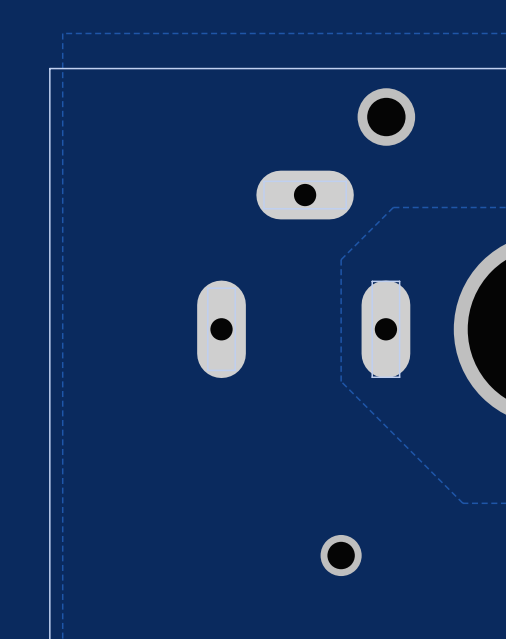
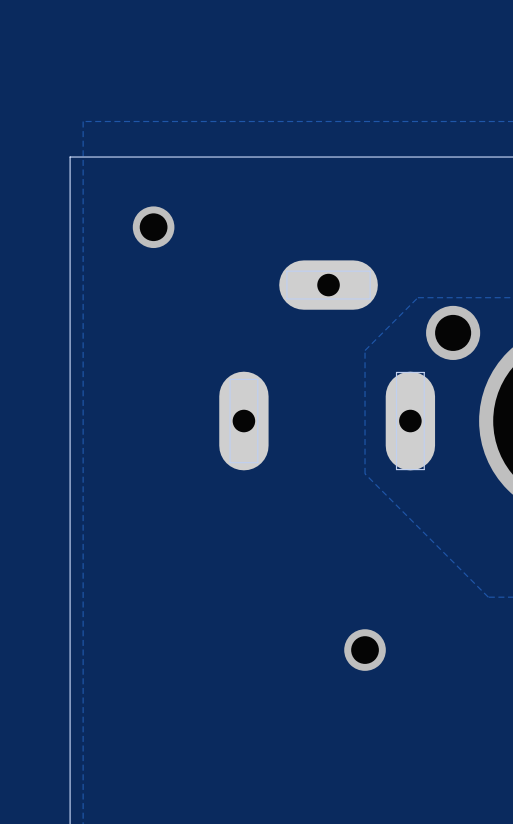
via: (386, 117) -> none
via: none -> (153, 227)
via: none -> (453, 332)

